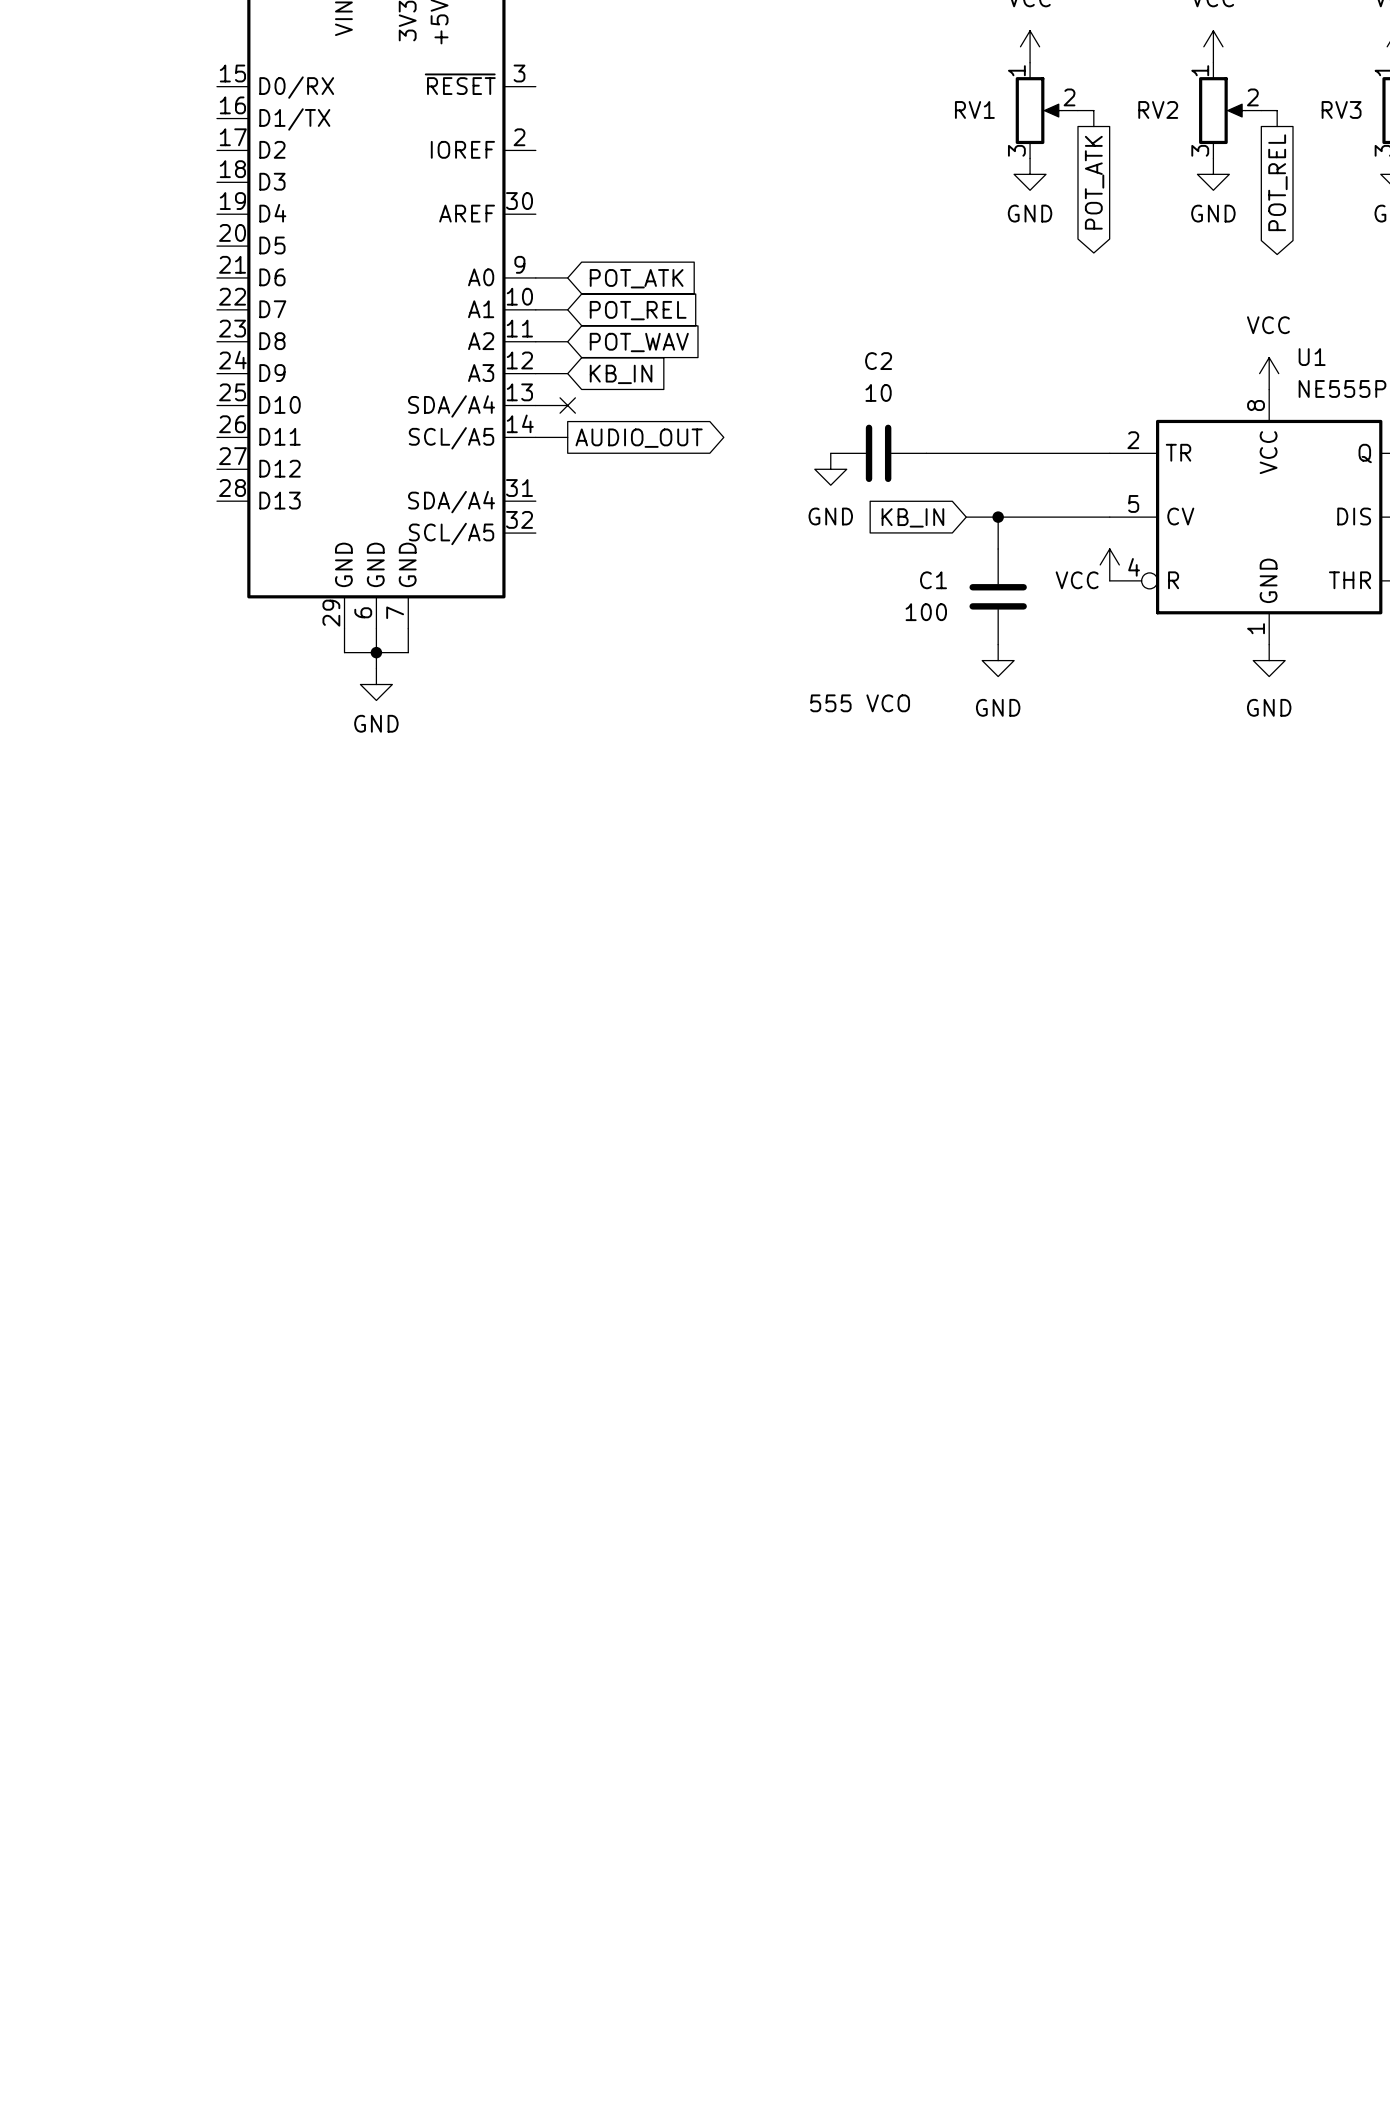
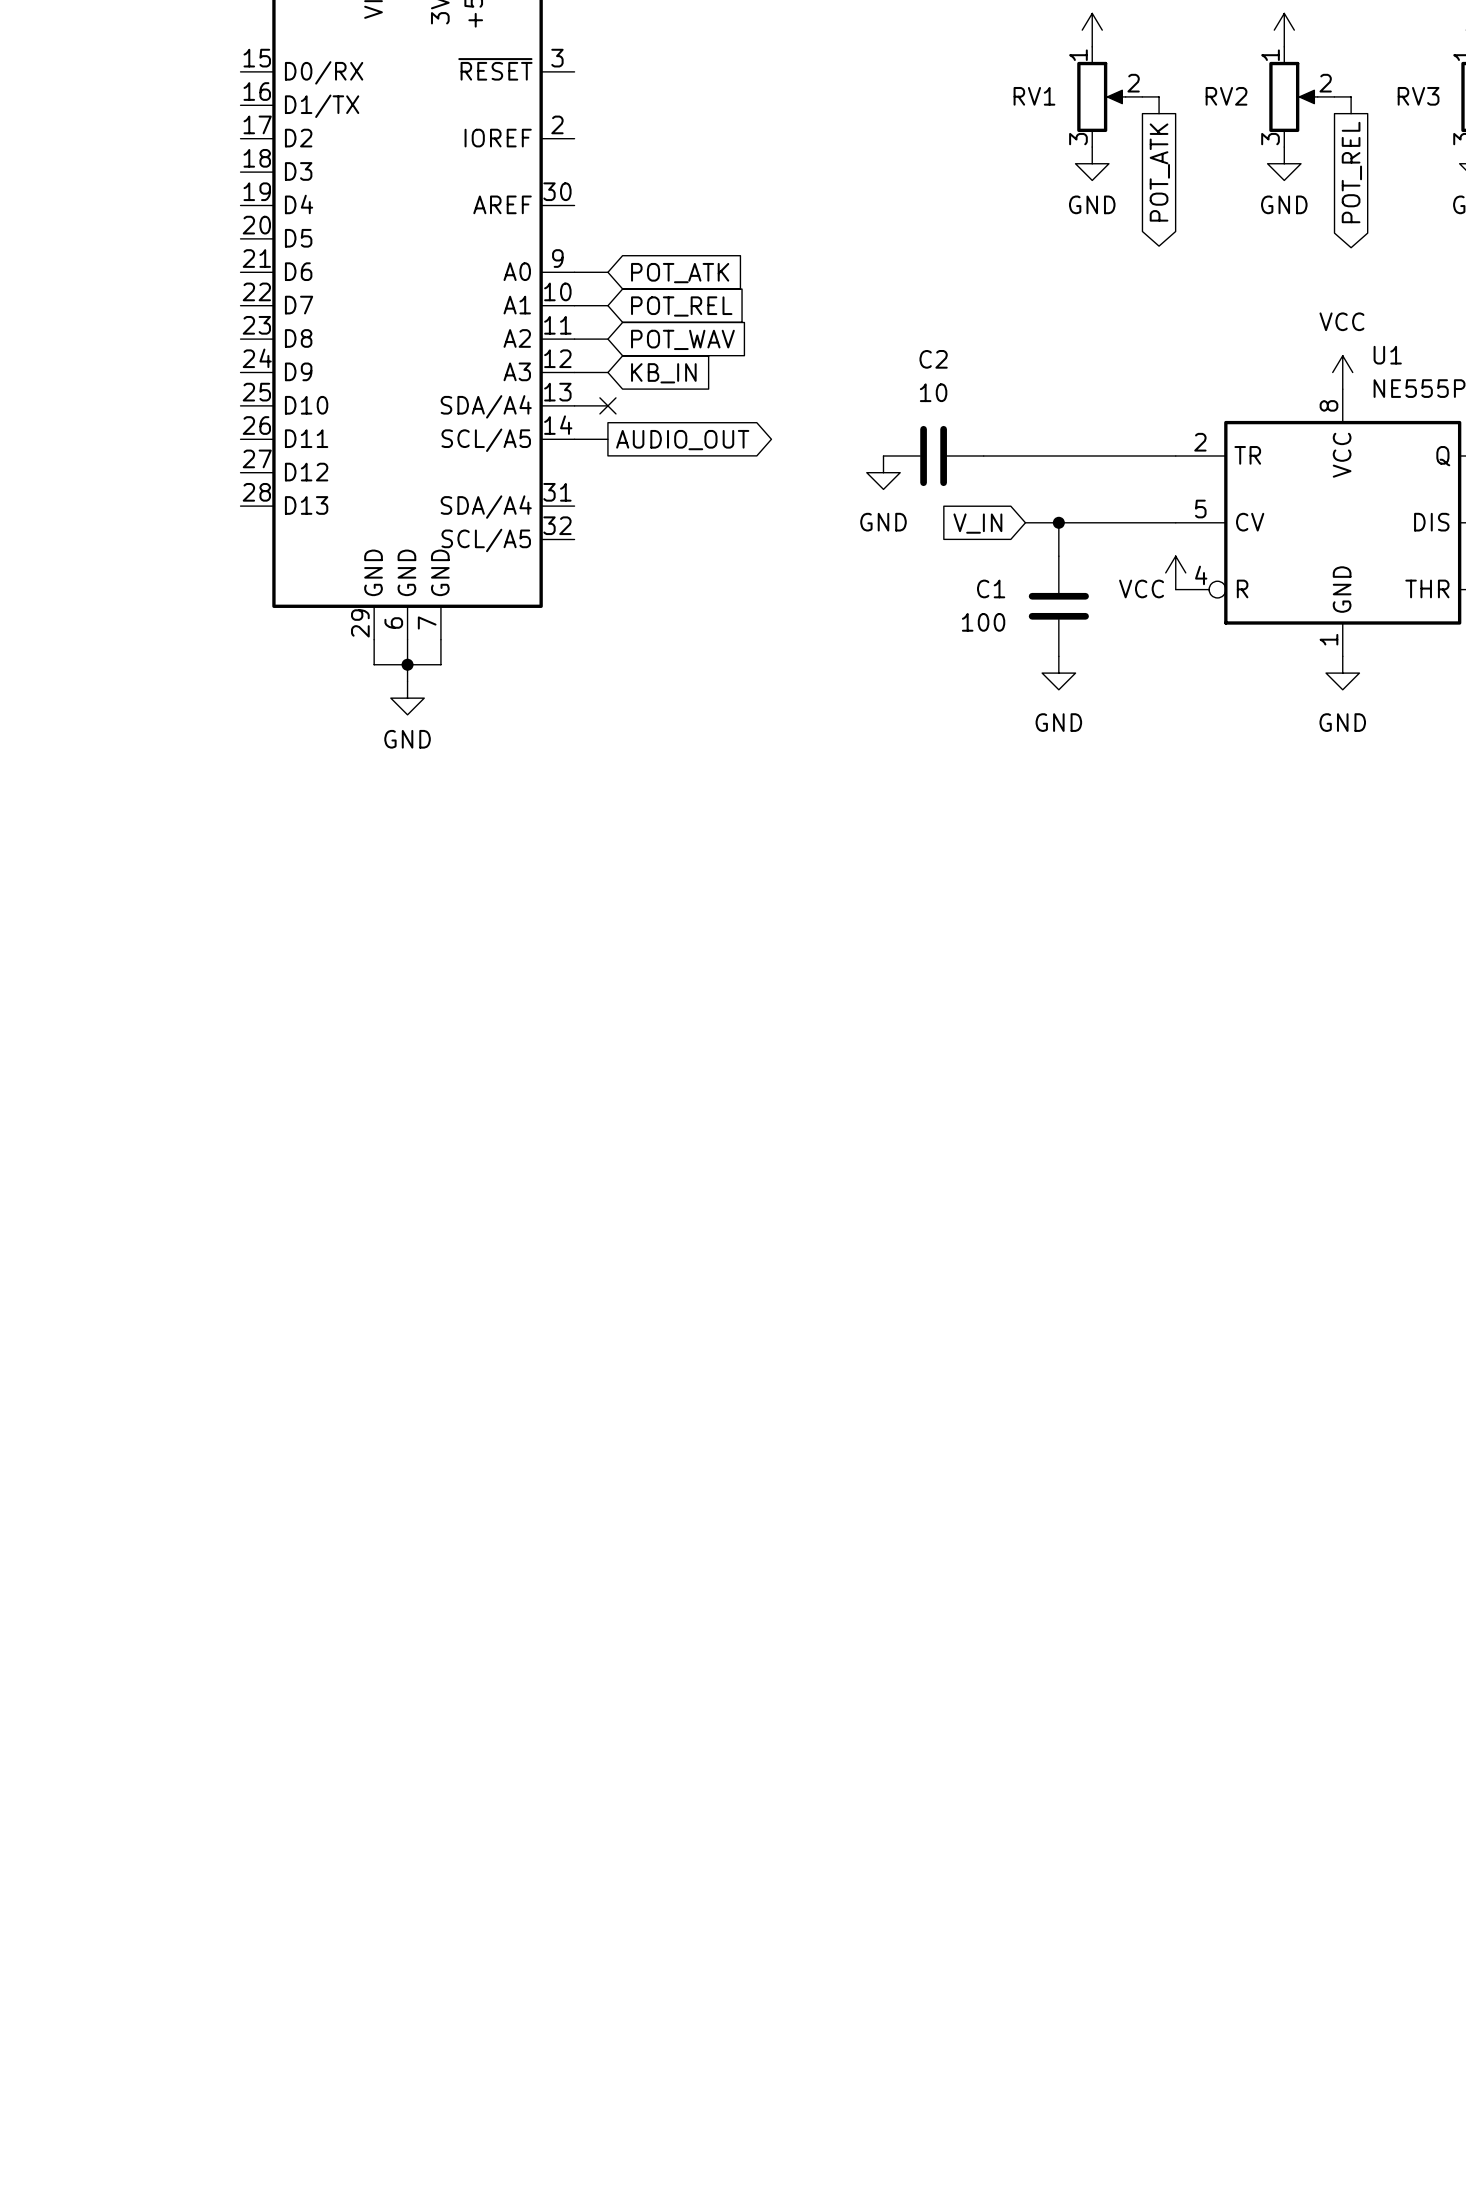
global label: KB_IN (912, 517) -> V_IN (977, 523)
text: 555 VCO (860, 703) -> none

